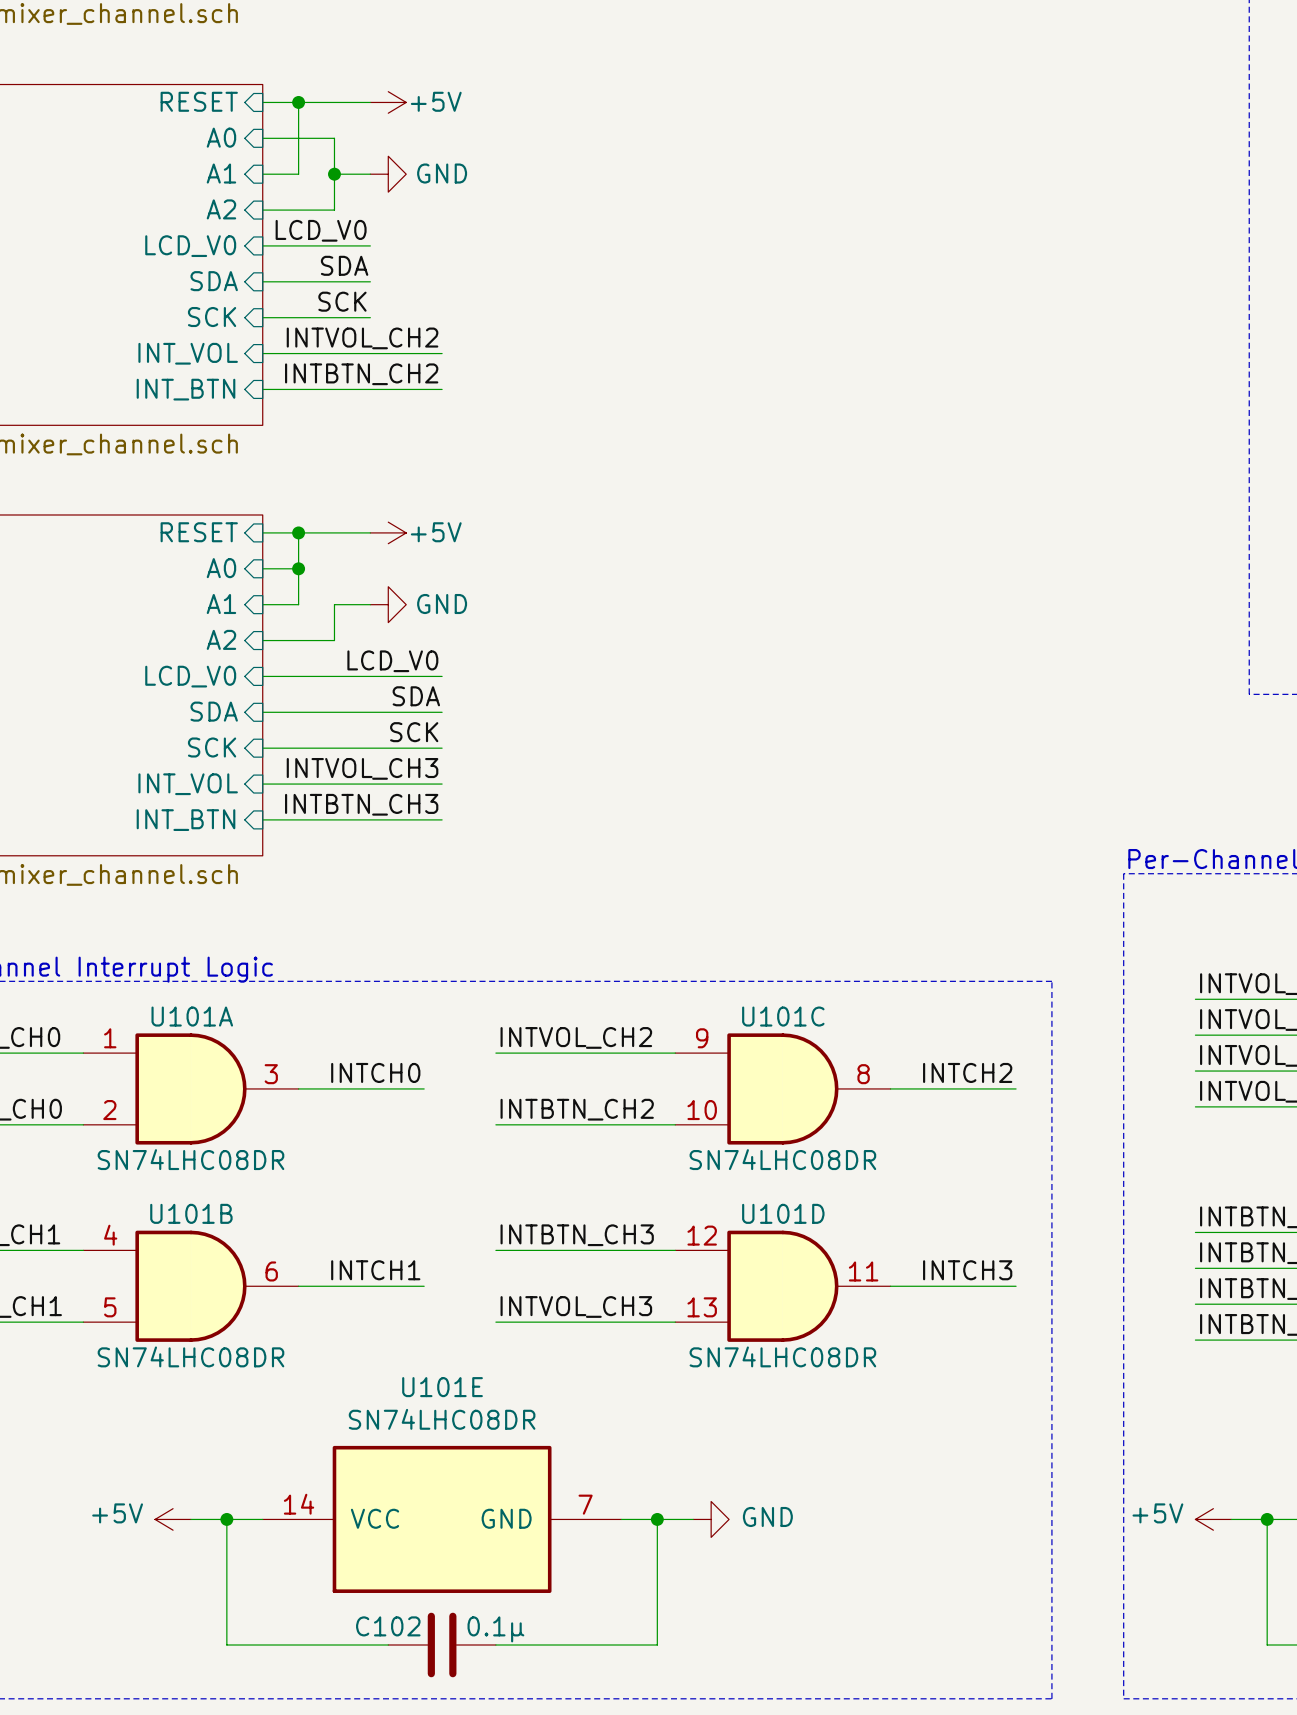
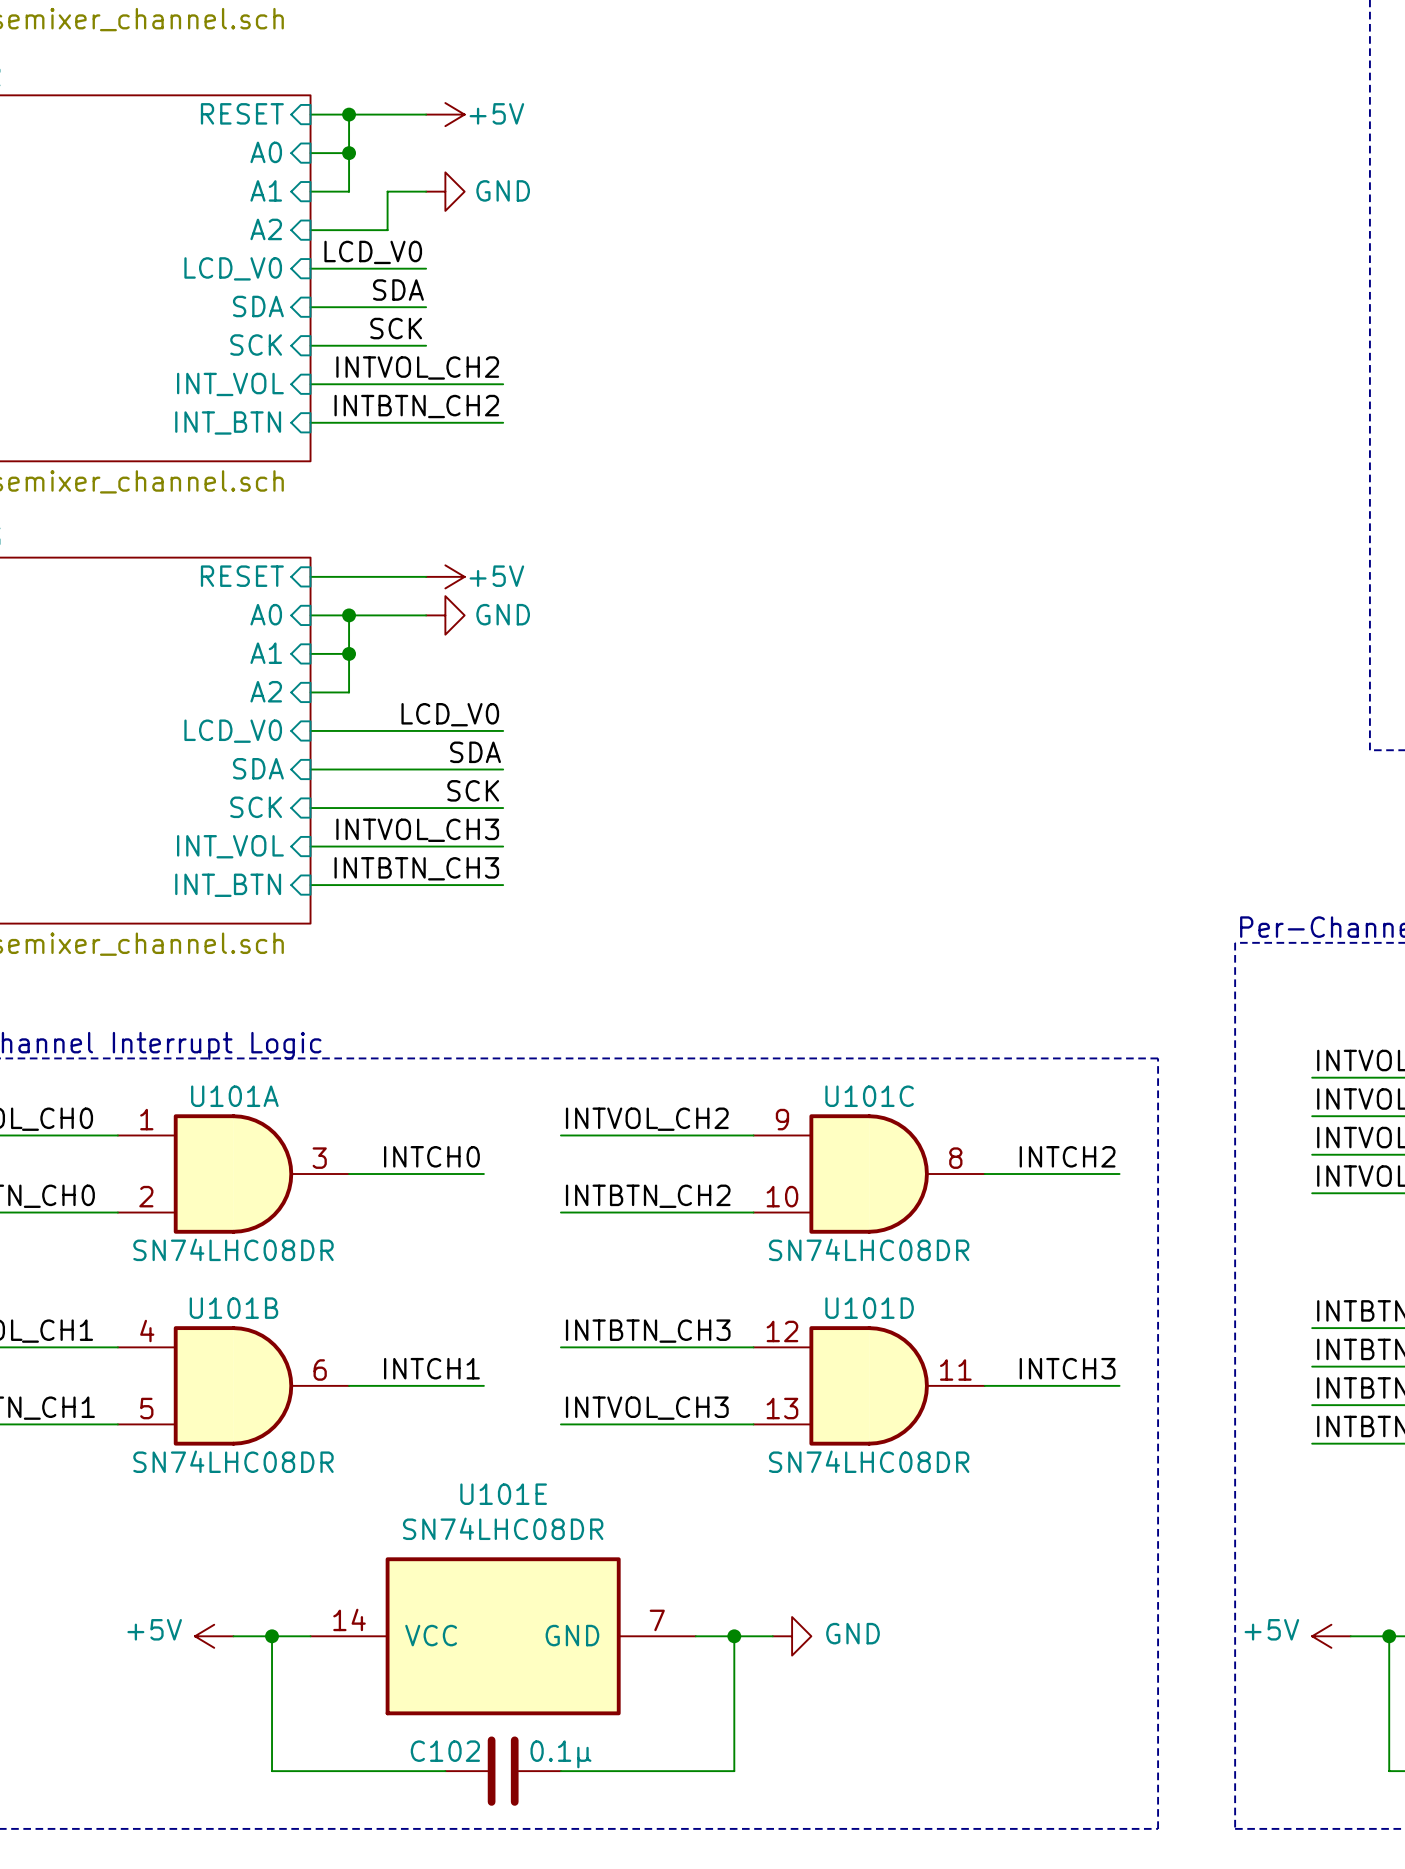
wire: (298, 138) (334, 138) (334, 174) -> none
junction position: (334, 174) -> (349, 153)
wire: (298, 532) (298, 568) -> (426, 615) (349, 615)
junction position: (298, 532) -> (349, 653)
wire: (370, 604) (334, 604) (334, 640) (298, 640) -> (349, 653) (349, 692)
power symbol position: GND (388, 604) -> GND (445, 615)

